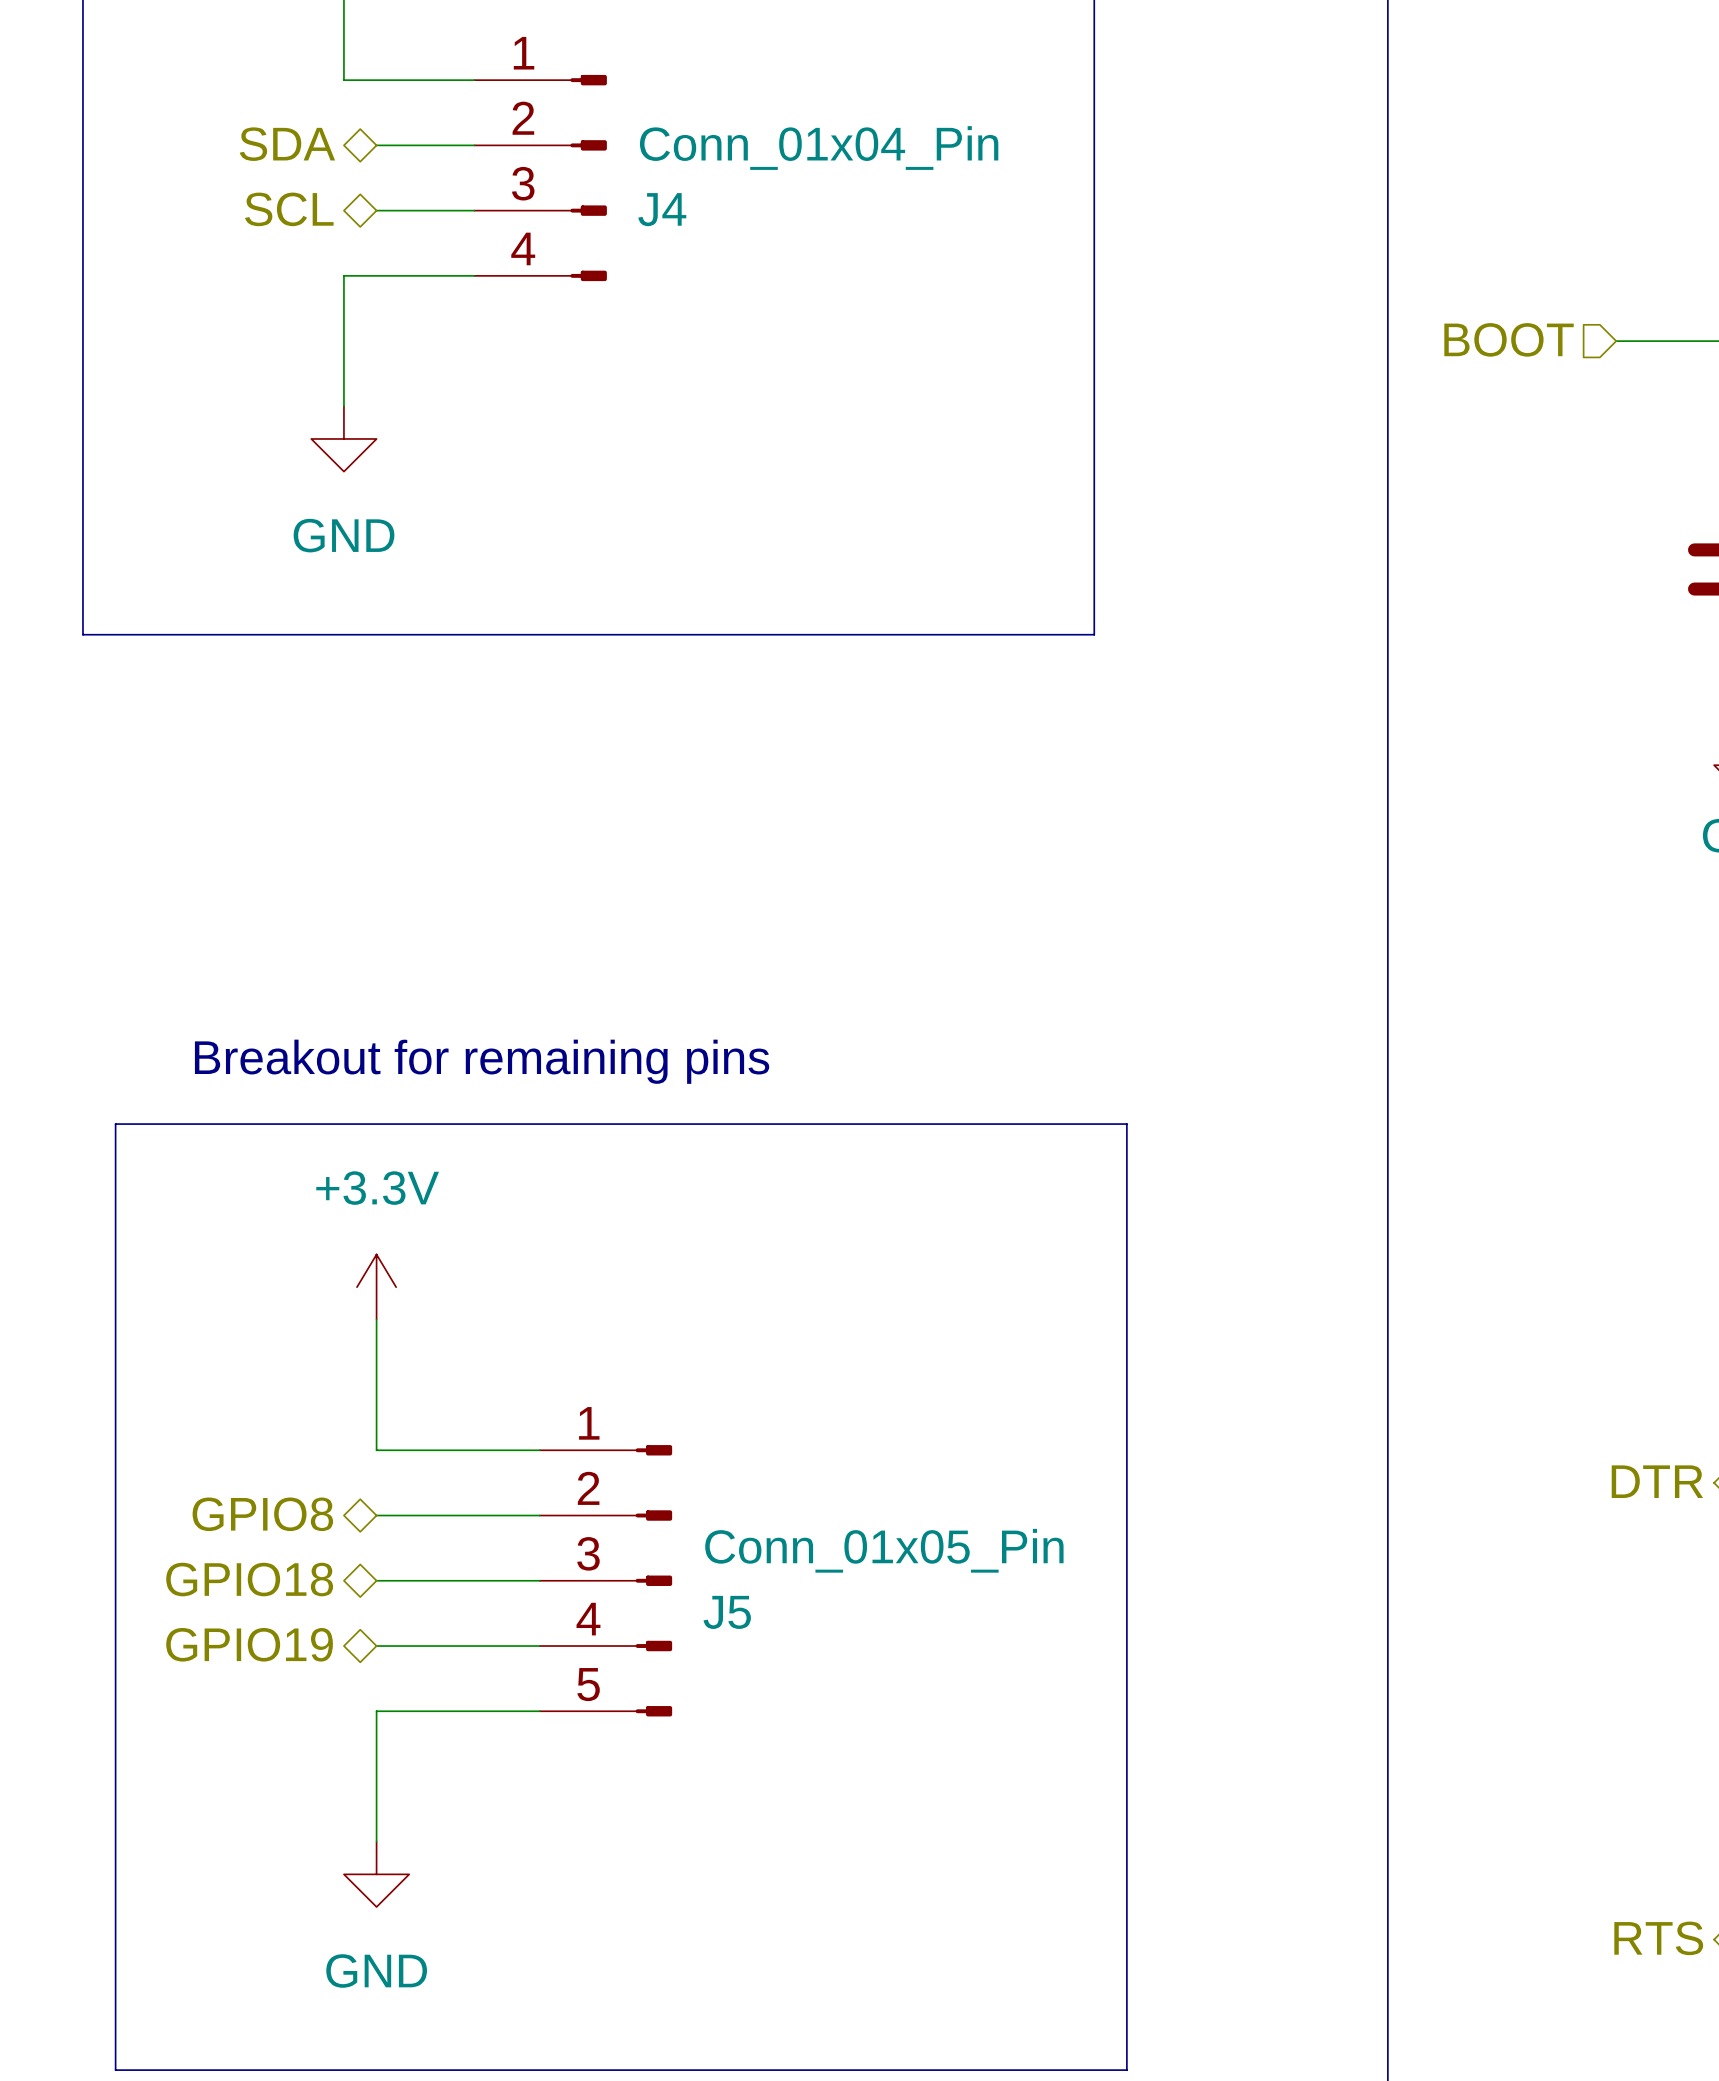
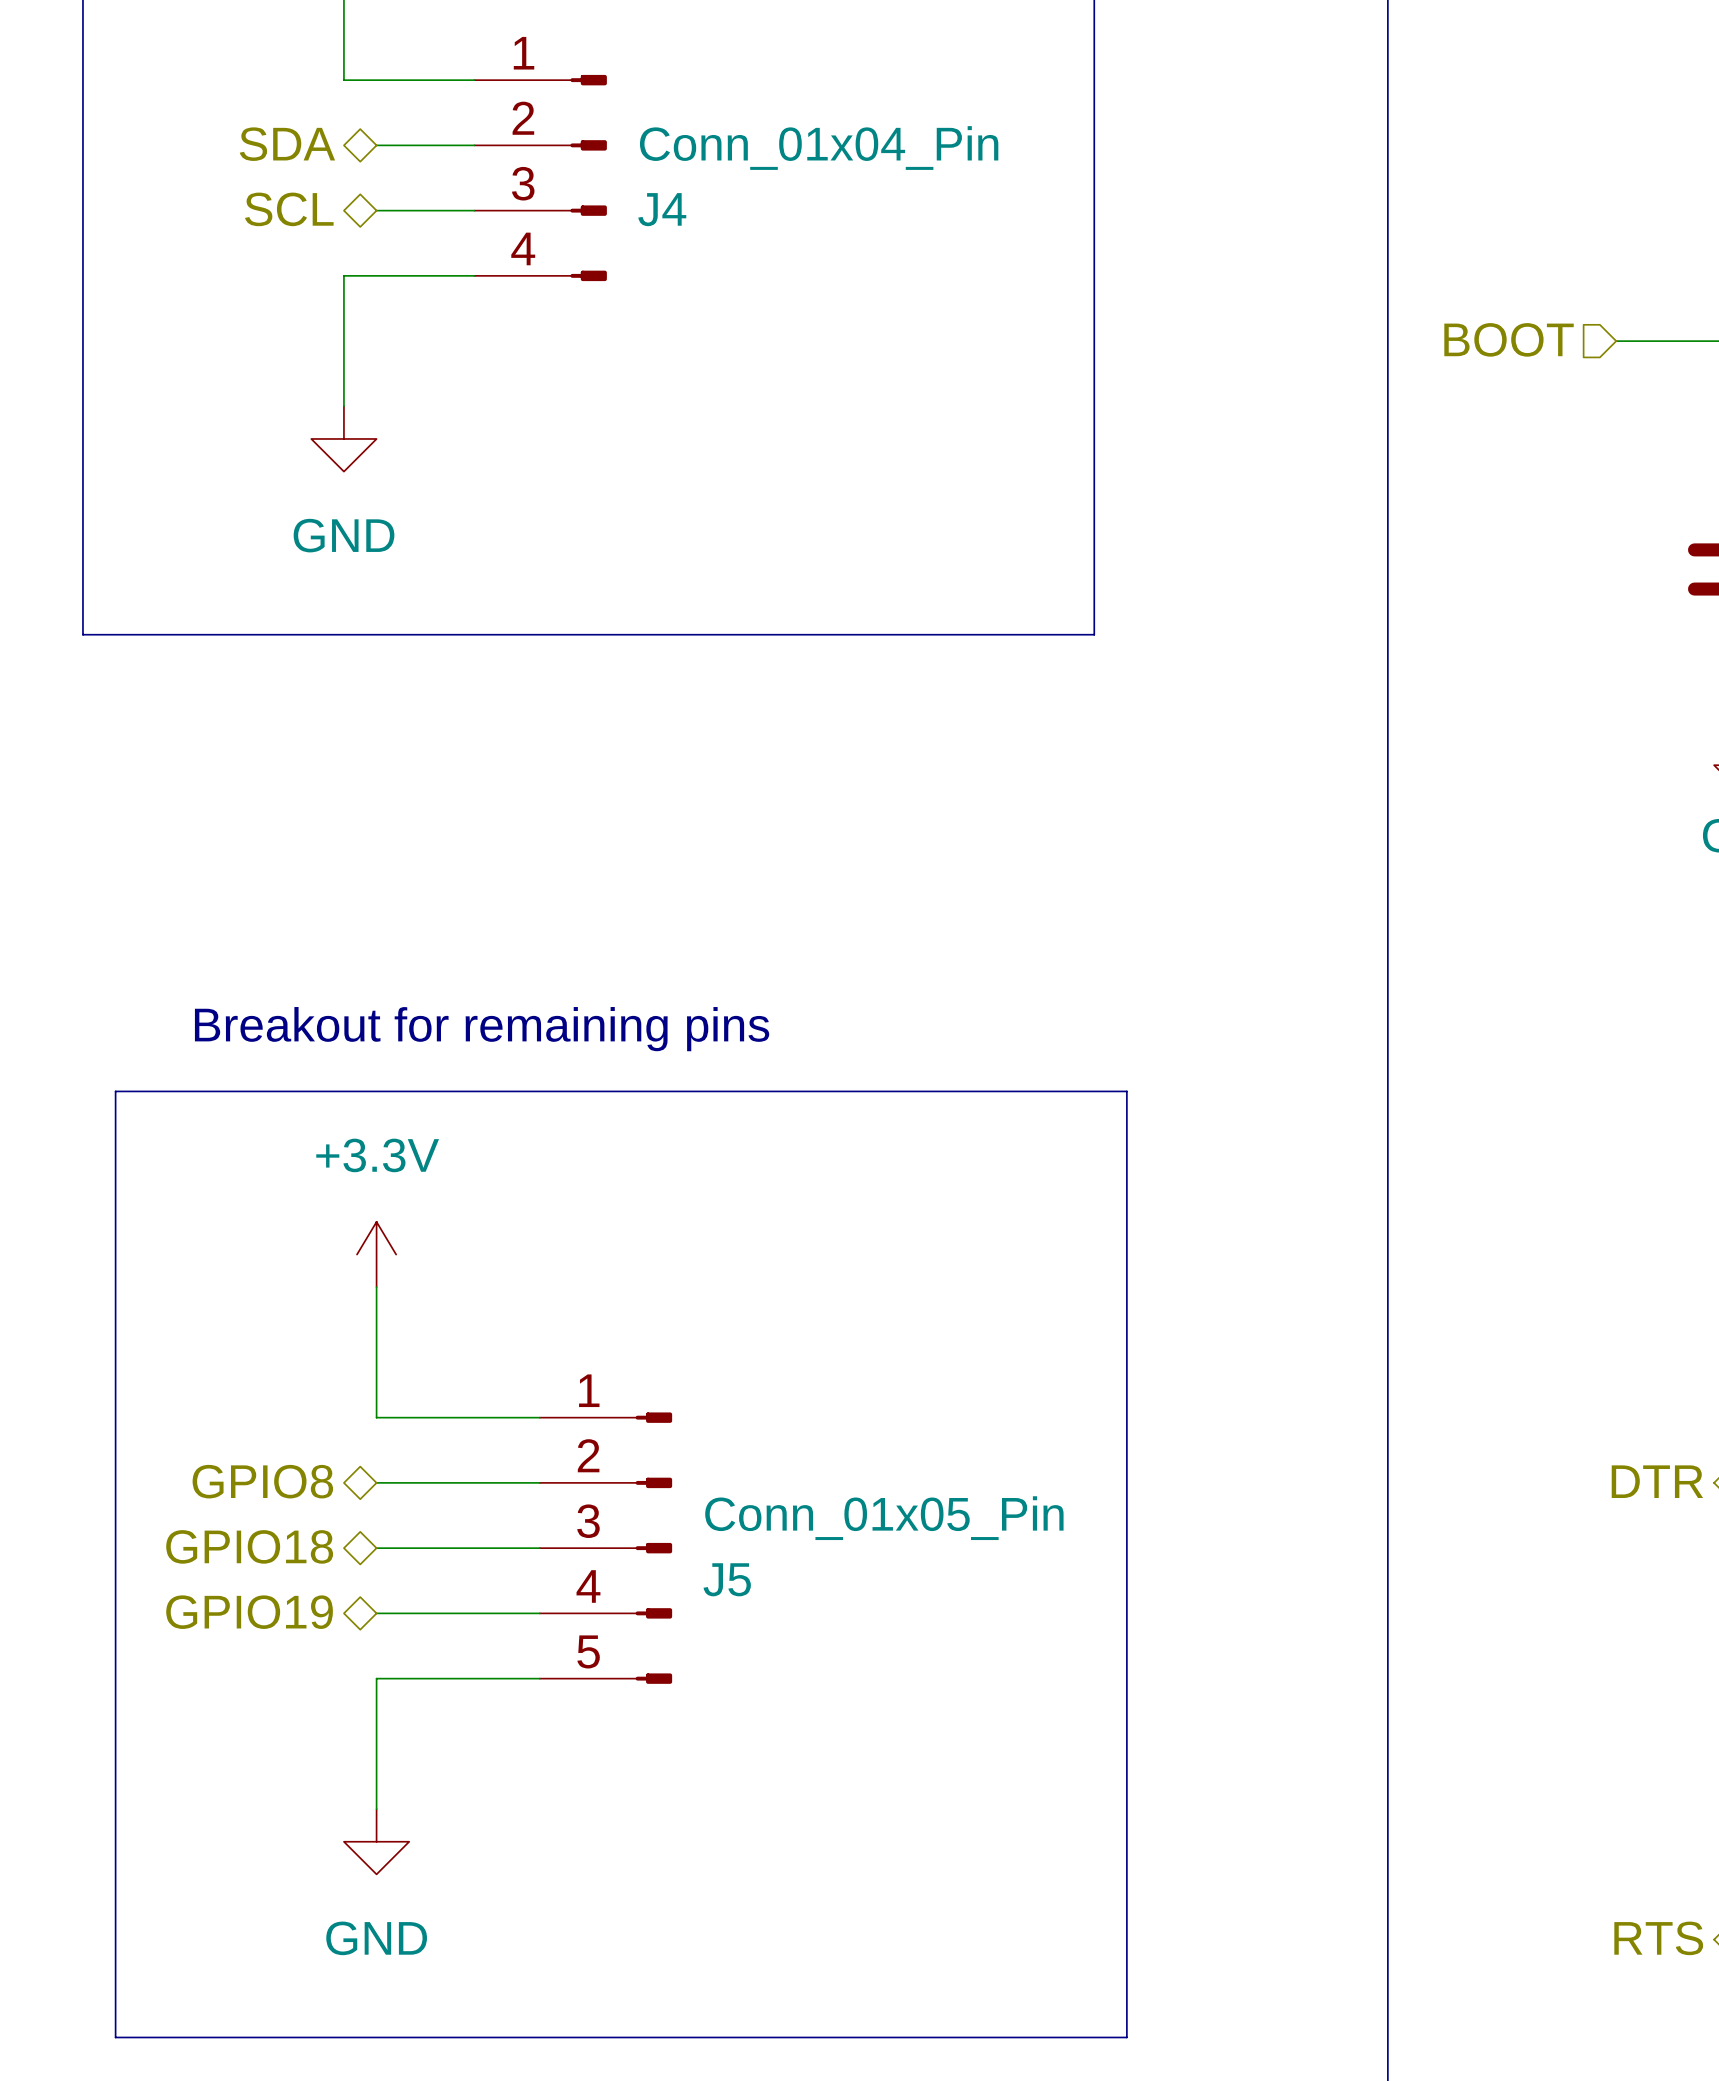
text position: Breakout for remaining pins (482, 1061) -> Breakout for remaining pins (482, 1029)
line: (115, 1124) (1126, 1124) -> (115, 1124) (115, 1091) (1126, 1091) (1126, 1124)
power symbol position: +3.3V (376, 1287) -> +3.3V (376, 1254)
wire: (376, 1417) (376, 1450) (539, 1450) -> (376, 1417) (539, 1417)
hierarchical label position: GPIO8 (262, 1514) -> GPIO8 (262, 1481)
wire: (376, 1515) (539, 1515) -> (376, 1613) (539, 1613)
hierarchical label position: GPIO18 (249, 1579) -> GPIO18 (249, 1546)
wire: (376, 1580) (539, 1580) -> (376, 1482) (539, 1482)
J5 position: (605, 1580) -> (605, 1548)
hierarchical label position: GPIO19 (249, 1644) -> GPIO19 (249, 1612)
wire: (376, 1646) (539, 1646) -> (376, 1548) (539, 1548)
wire: (376, 1711) (539, 1711) -> (376, 1711) (376, 1678) (539, 1678)
power symbol position: GND (376, 1874) -> GND (376, 1841)
line: (115, 2037) (115, 2070) (1126, 2070) (1126, 2037) -> (115, 2037) (1126, 2037)

